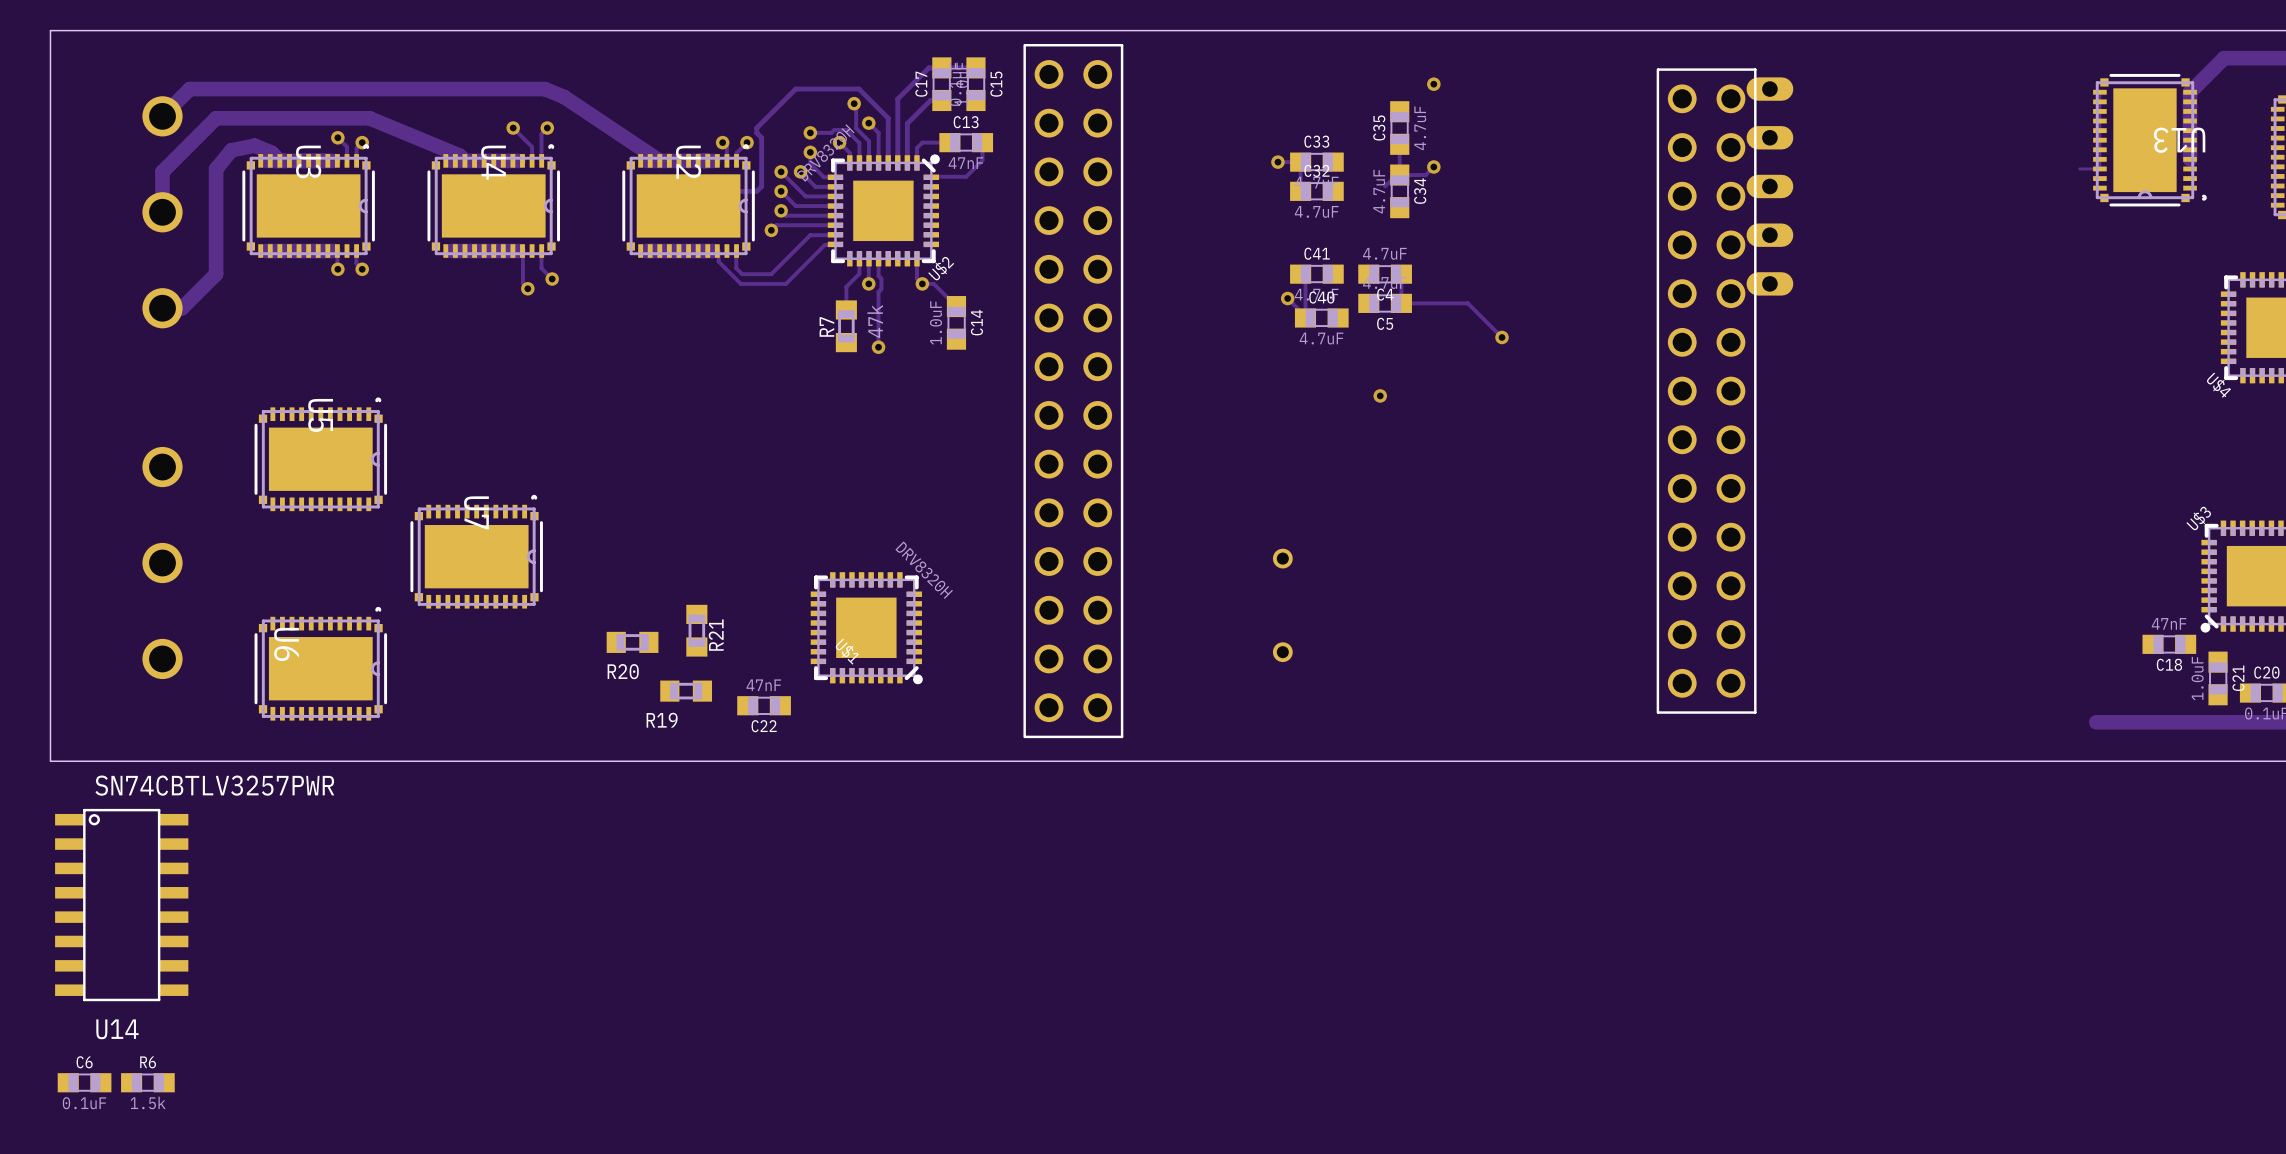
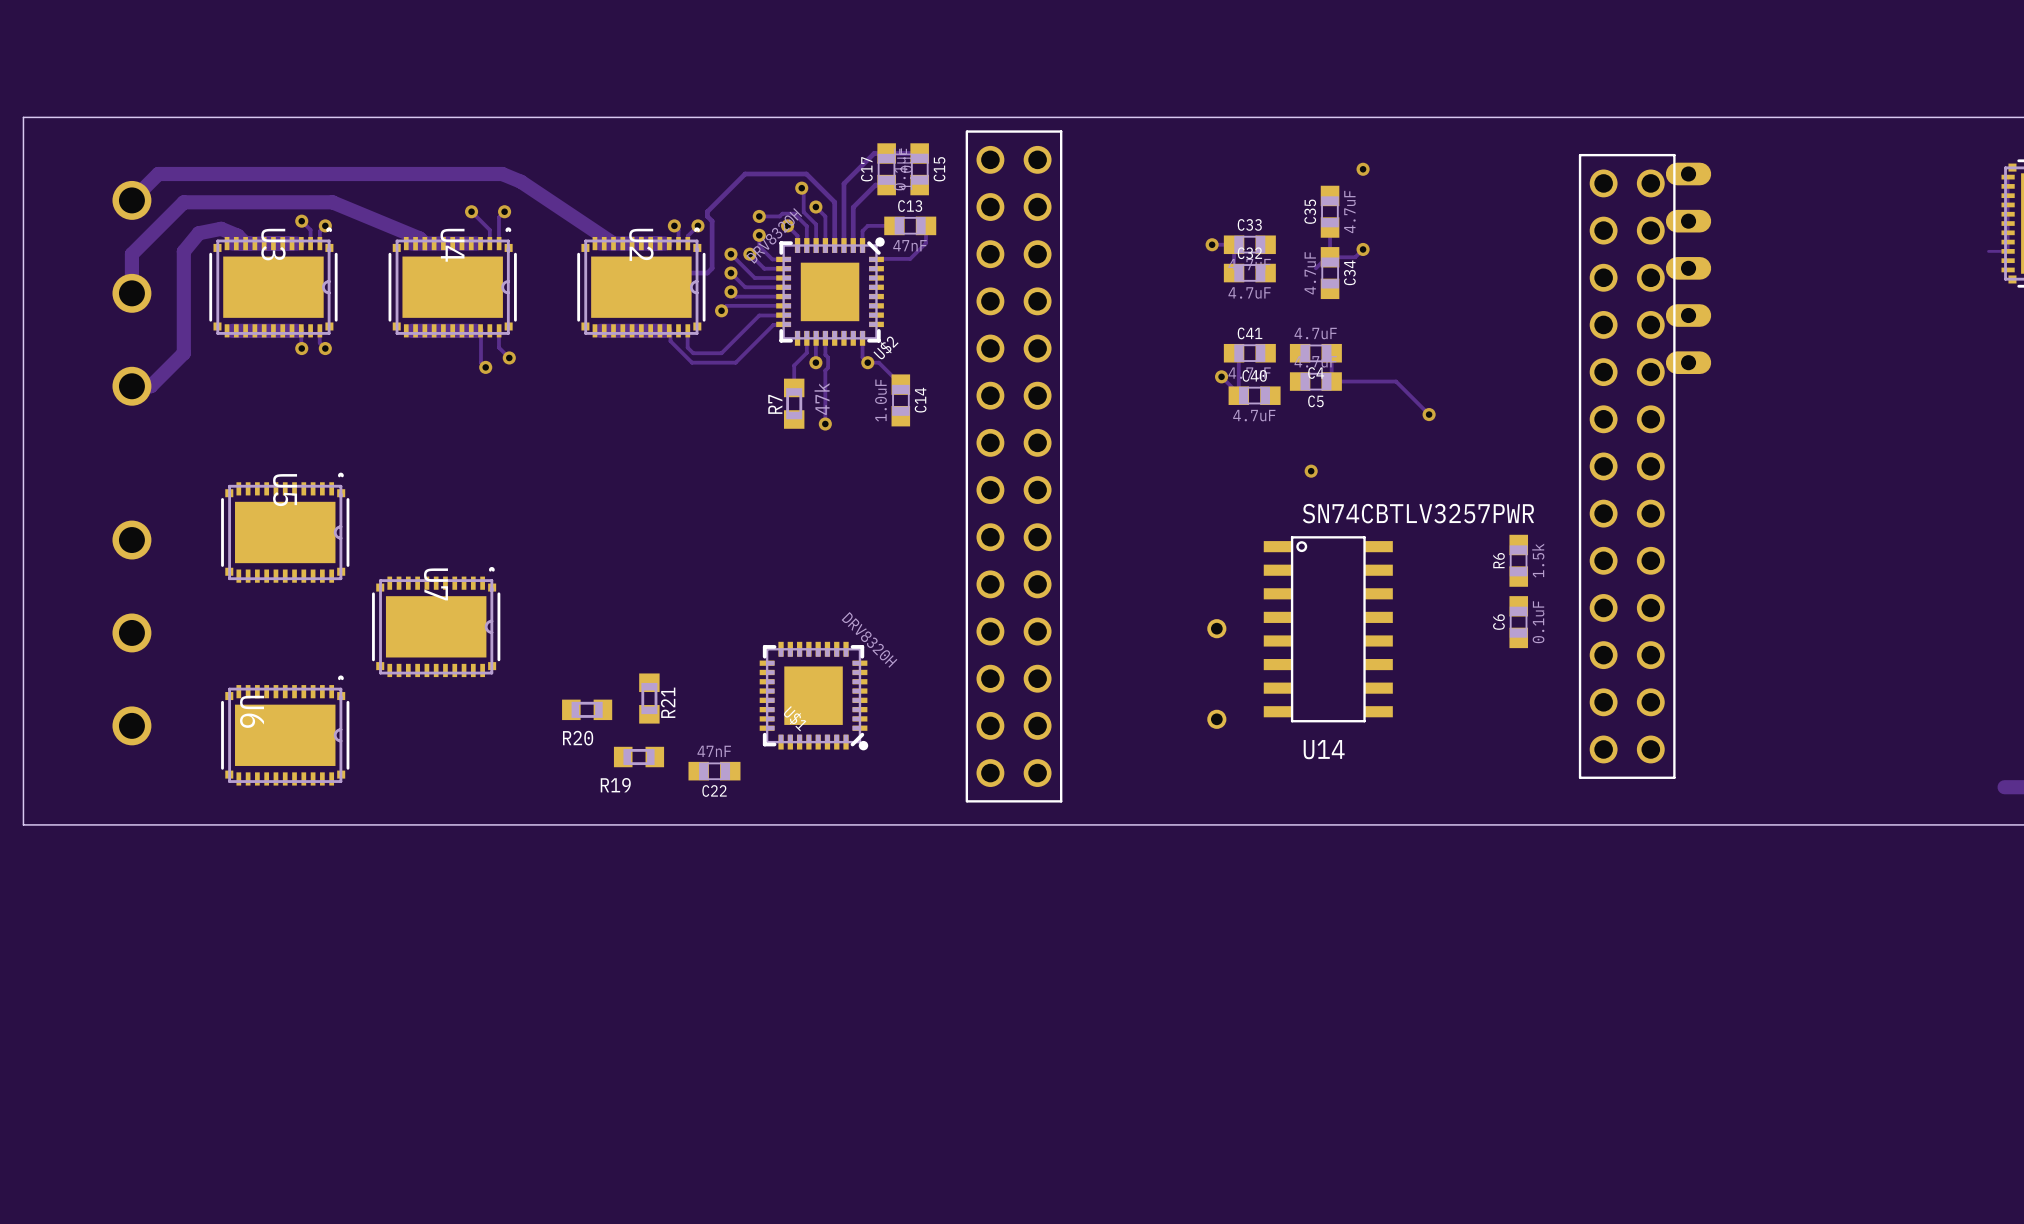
U14 position: (121, 905) -> (1328, 629)
C6 rotation: 0° (84, 1082) -> 90° clockwise (1518, 622)
C6 position: (84, 1082) -> (1518, 622)
R6 rotation: 0° (147, 1082) -> 90° clockwise (1518, 560)
R6 position: (147, 1082) -> (1518, 560)

